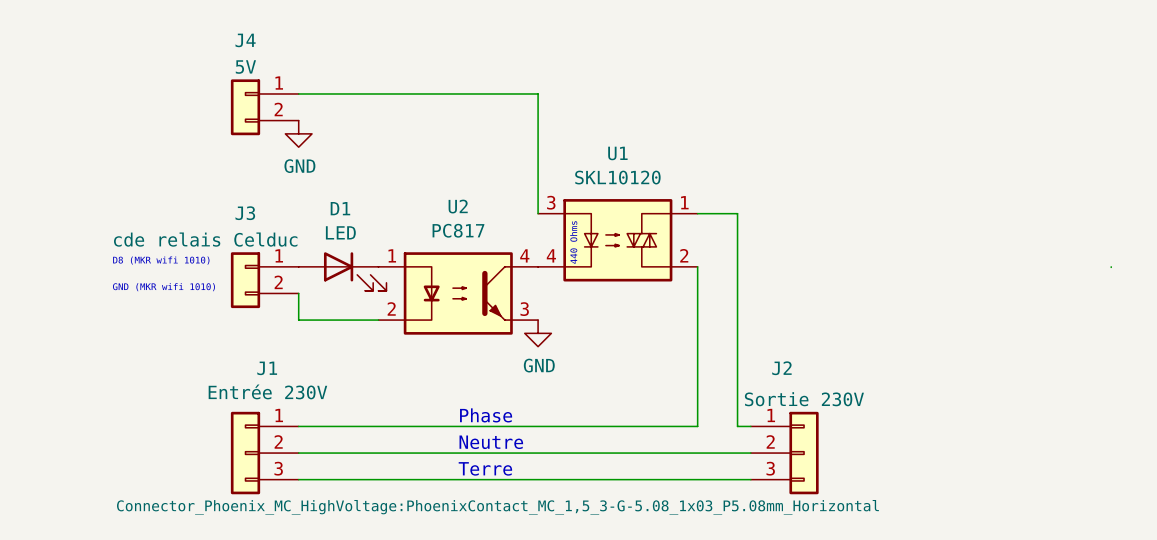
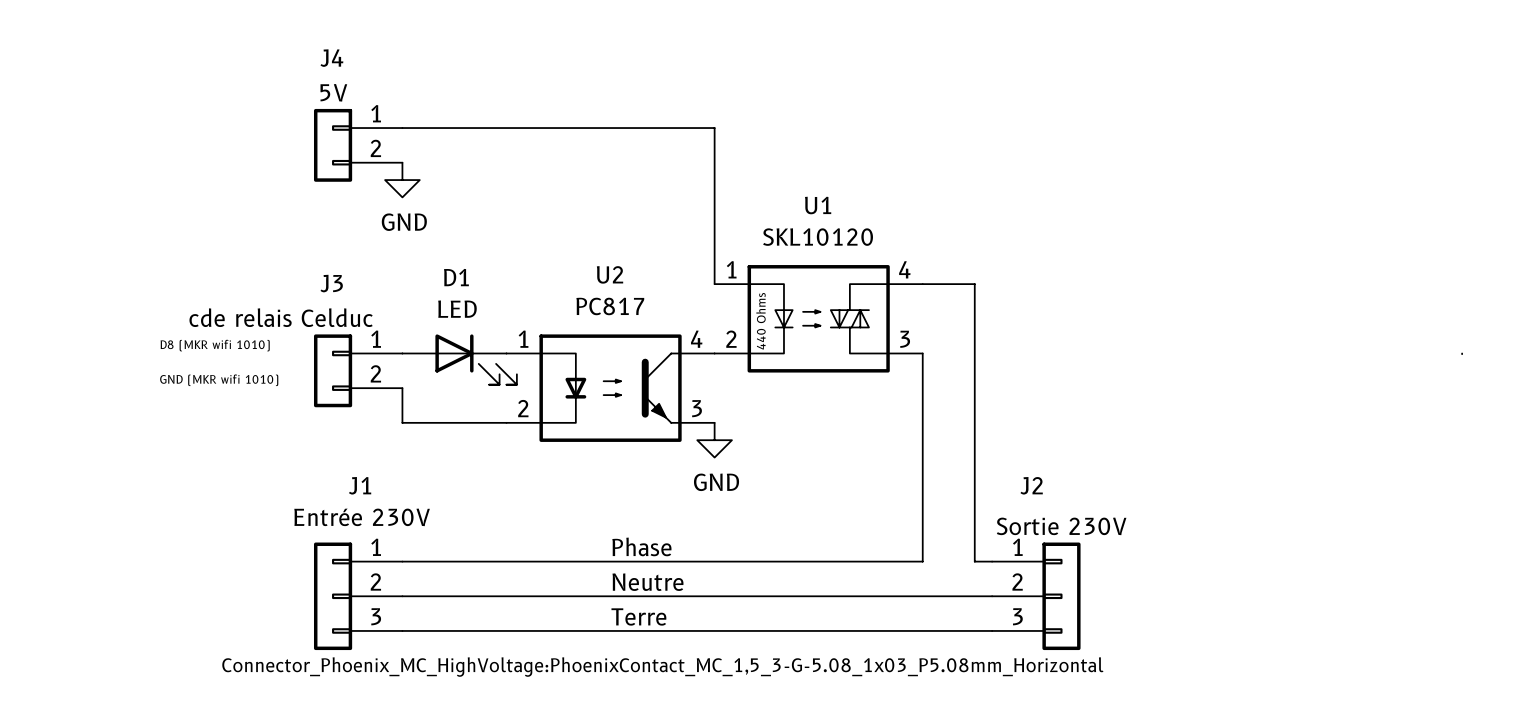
U1 pin number: 3 (551, 202) -> 1 (731, 269)
U1 pin number: 1 (684, 202) -> 4 (904, 269)
U1 pin number: 4 (551, 255) -> 2 (731, 339)
U1 pin number: 2 (684, 255) -> 3 (905, 339)

